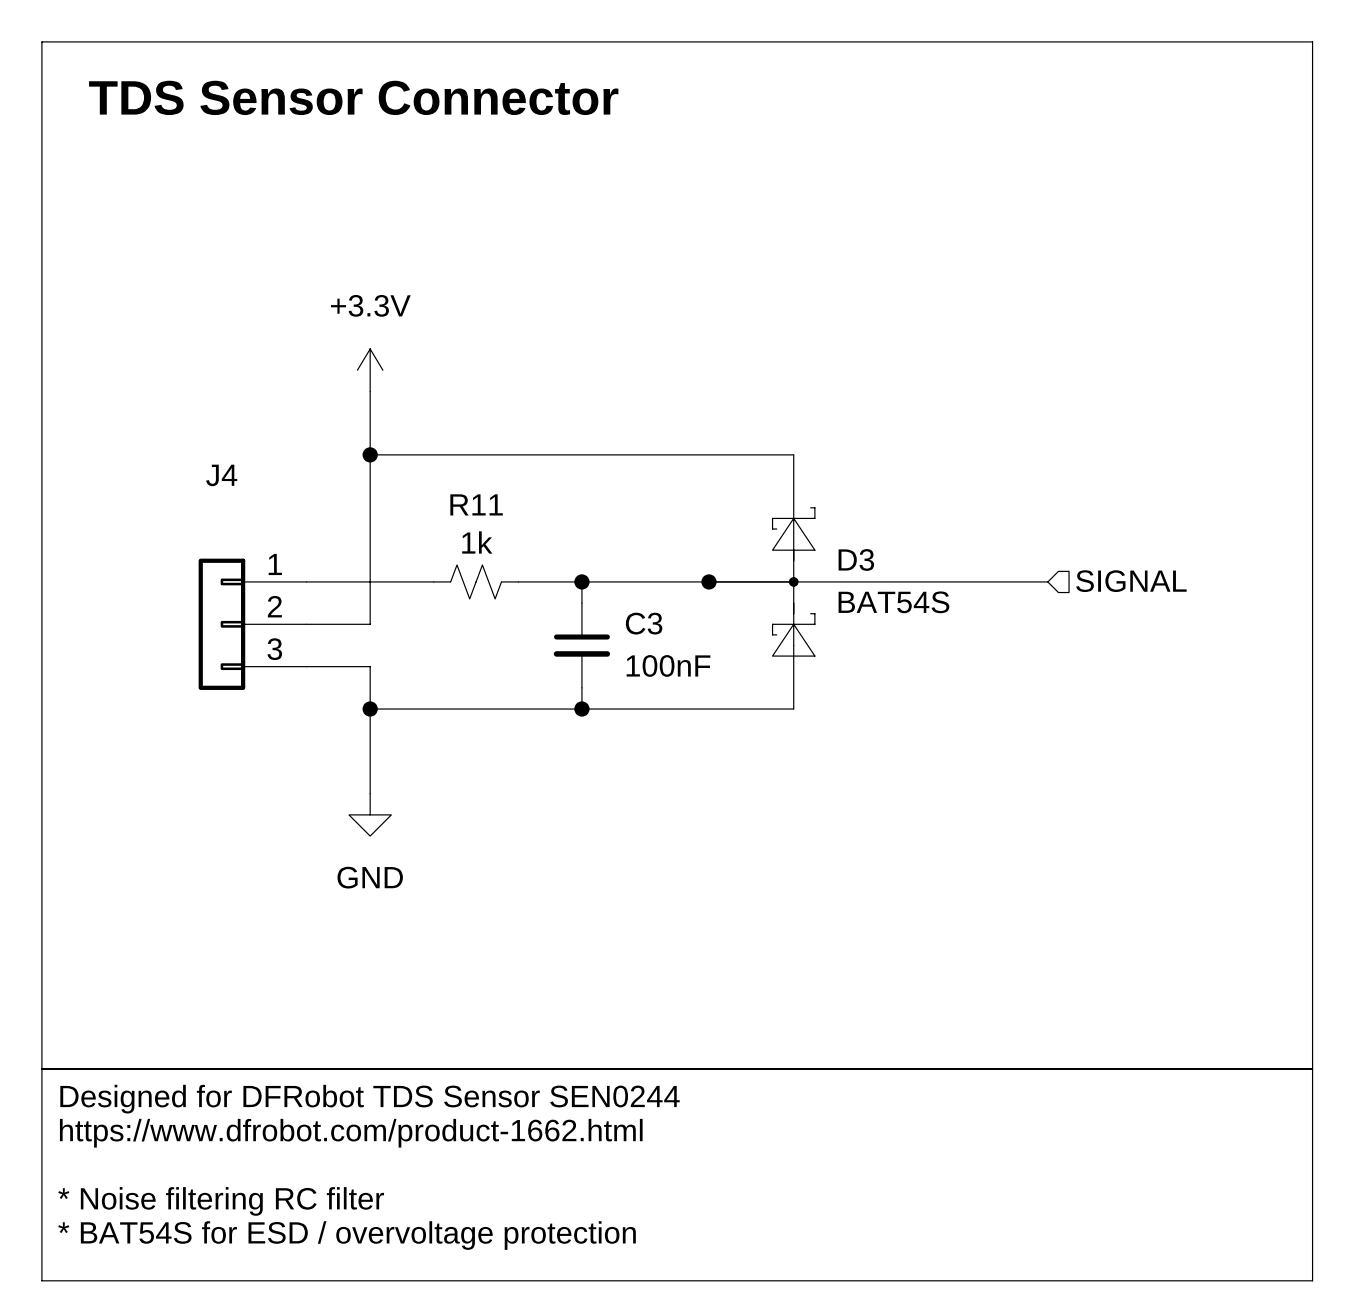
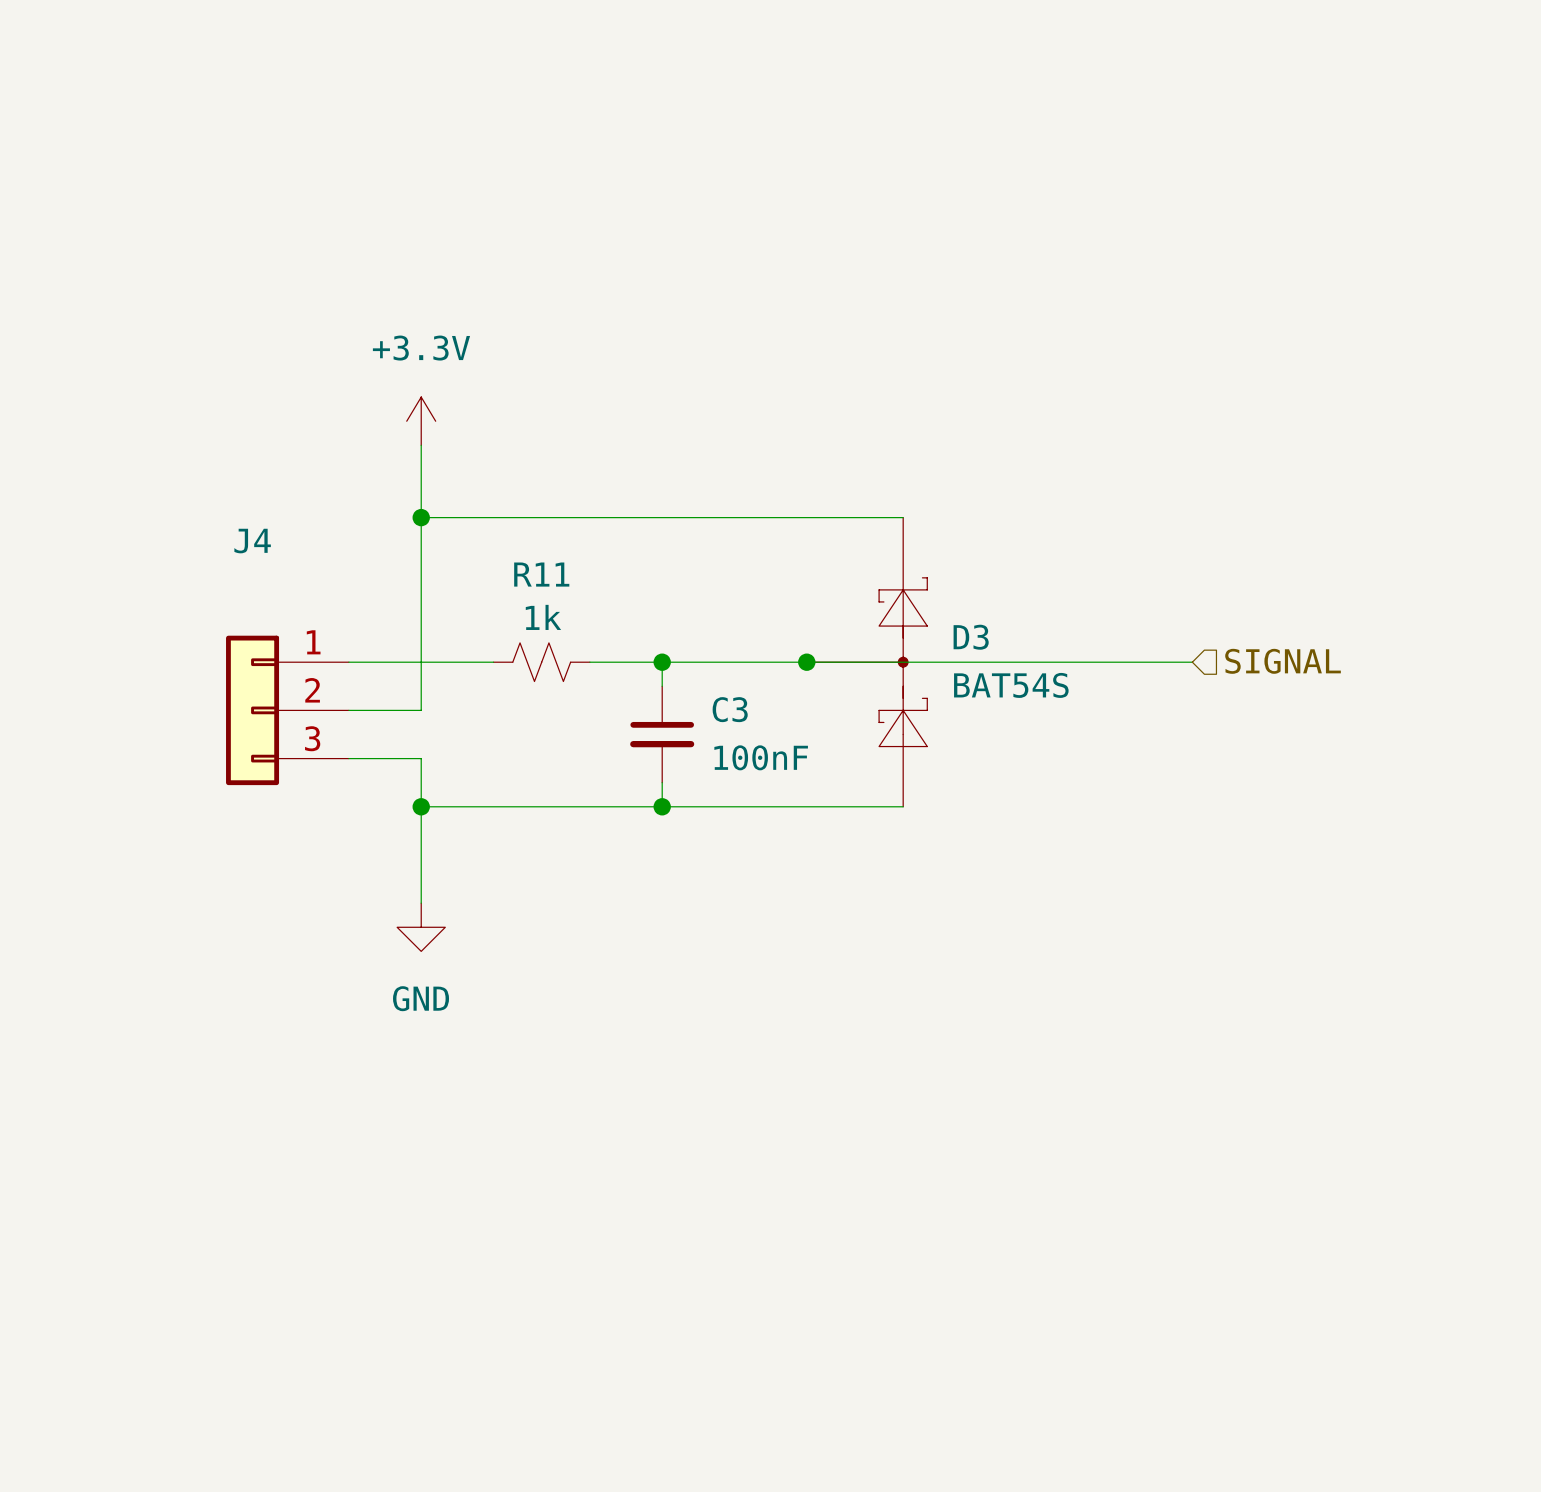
line: (41, 41) (1312, 41) (1312, 1280) (41, 1280) (41, 41) -> none
text: TDS Sensor Connector (353, 97) -> none
line: (41, 1069) (1312, 1069) -> none
text: Designed for DFRobot TDS Sensor SEN0244 (370, 1099) -> none
text: https://www.dfrobot.com/product-1662.html (351, 1133) -> none
text: * Noise filtering RC filter (221, 1201) -> none
text: * BAT54S for ESD / overvoltage protection (347, 1235) -> none

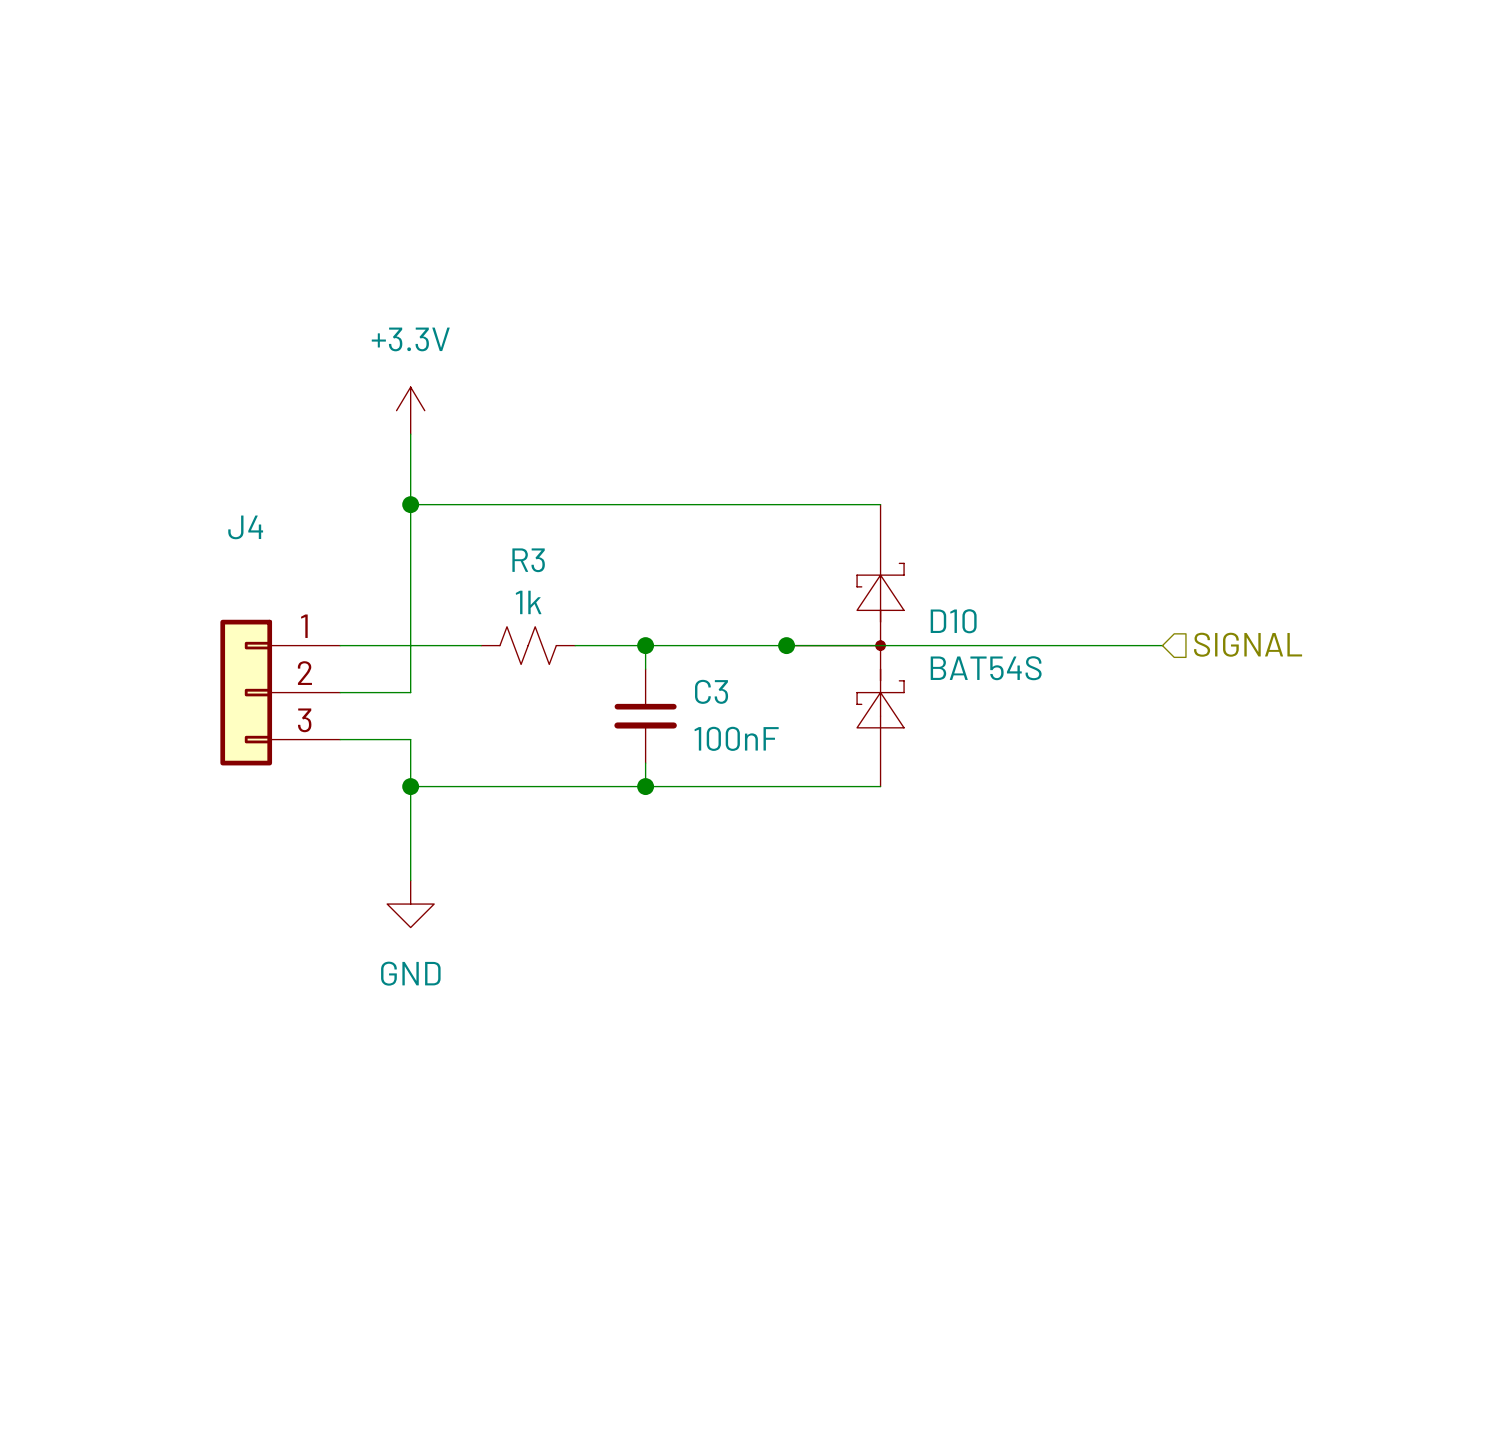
R11 name: R11 (541, 574) -> R3 (528, 560)
D3 name: D3 (971, 637) -> D10 (953, 621)

